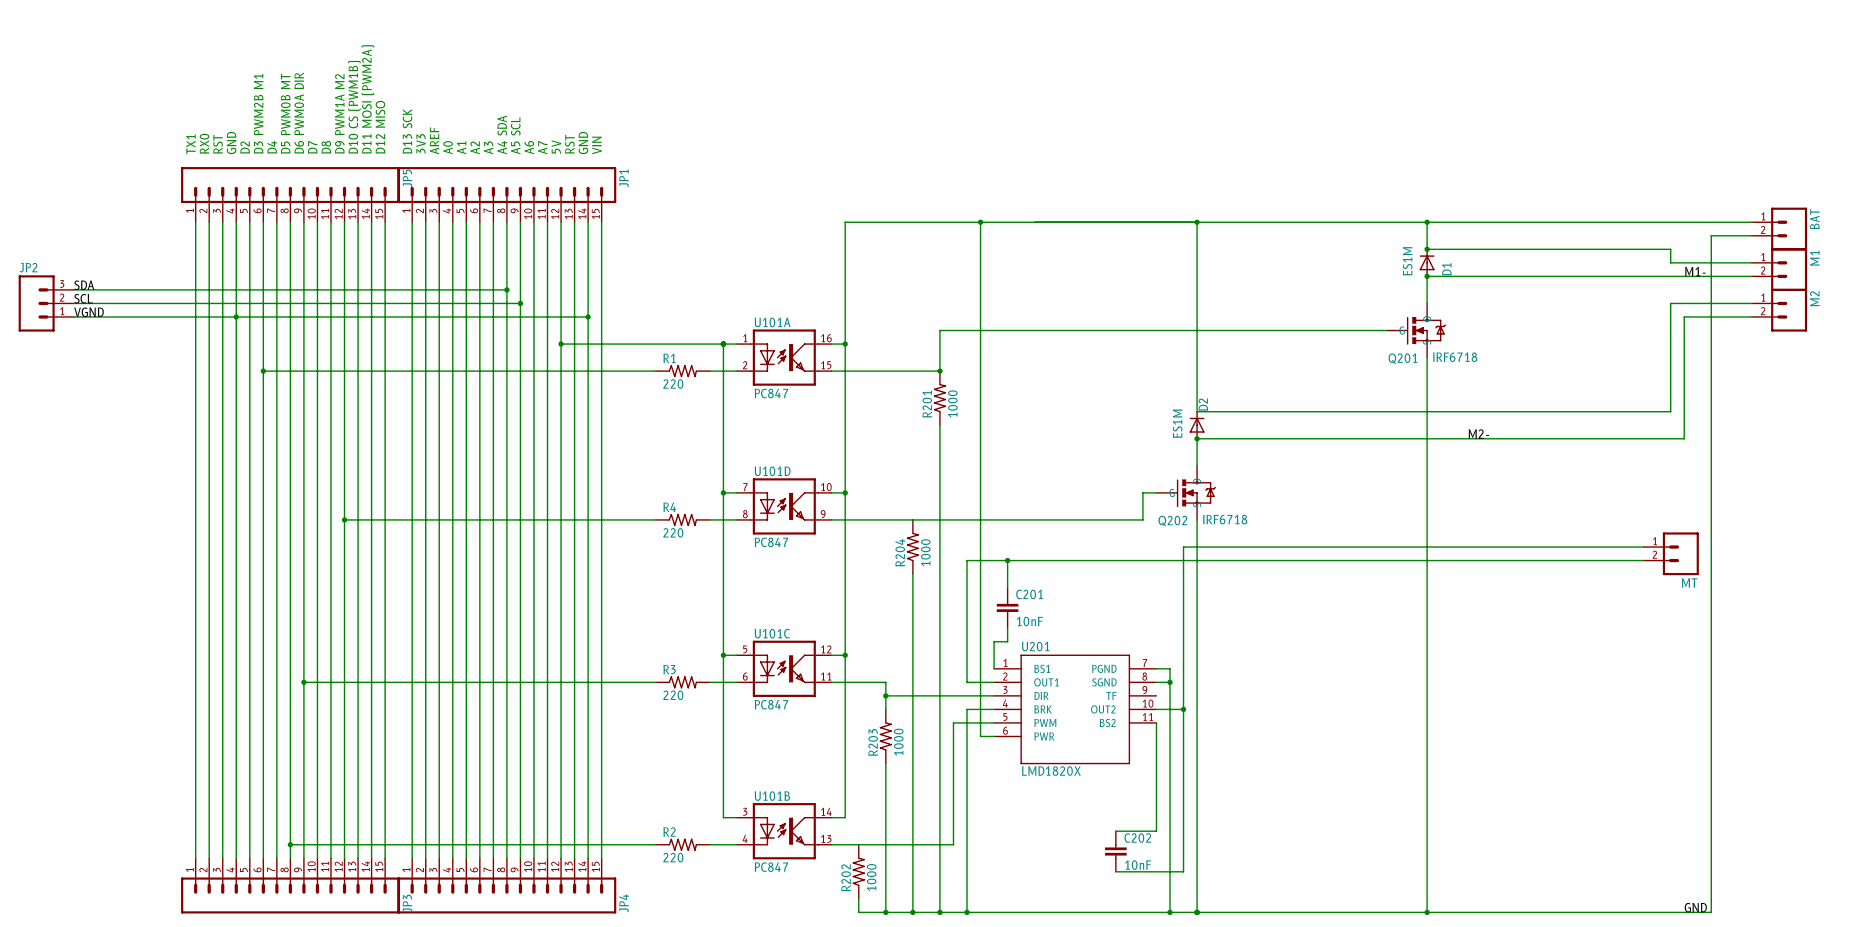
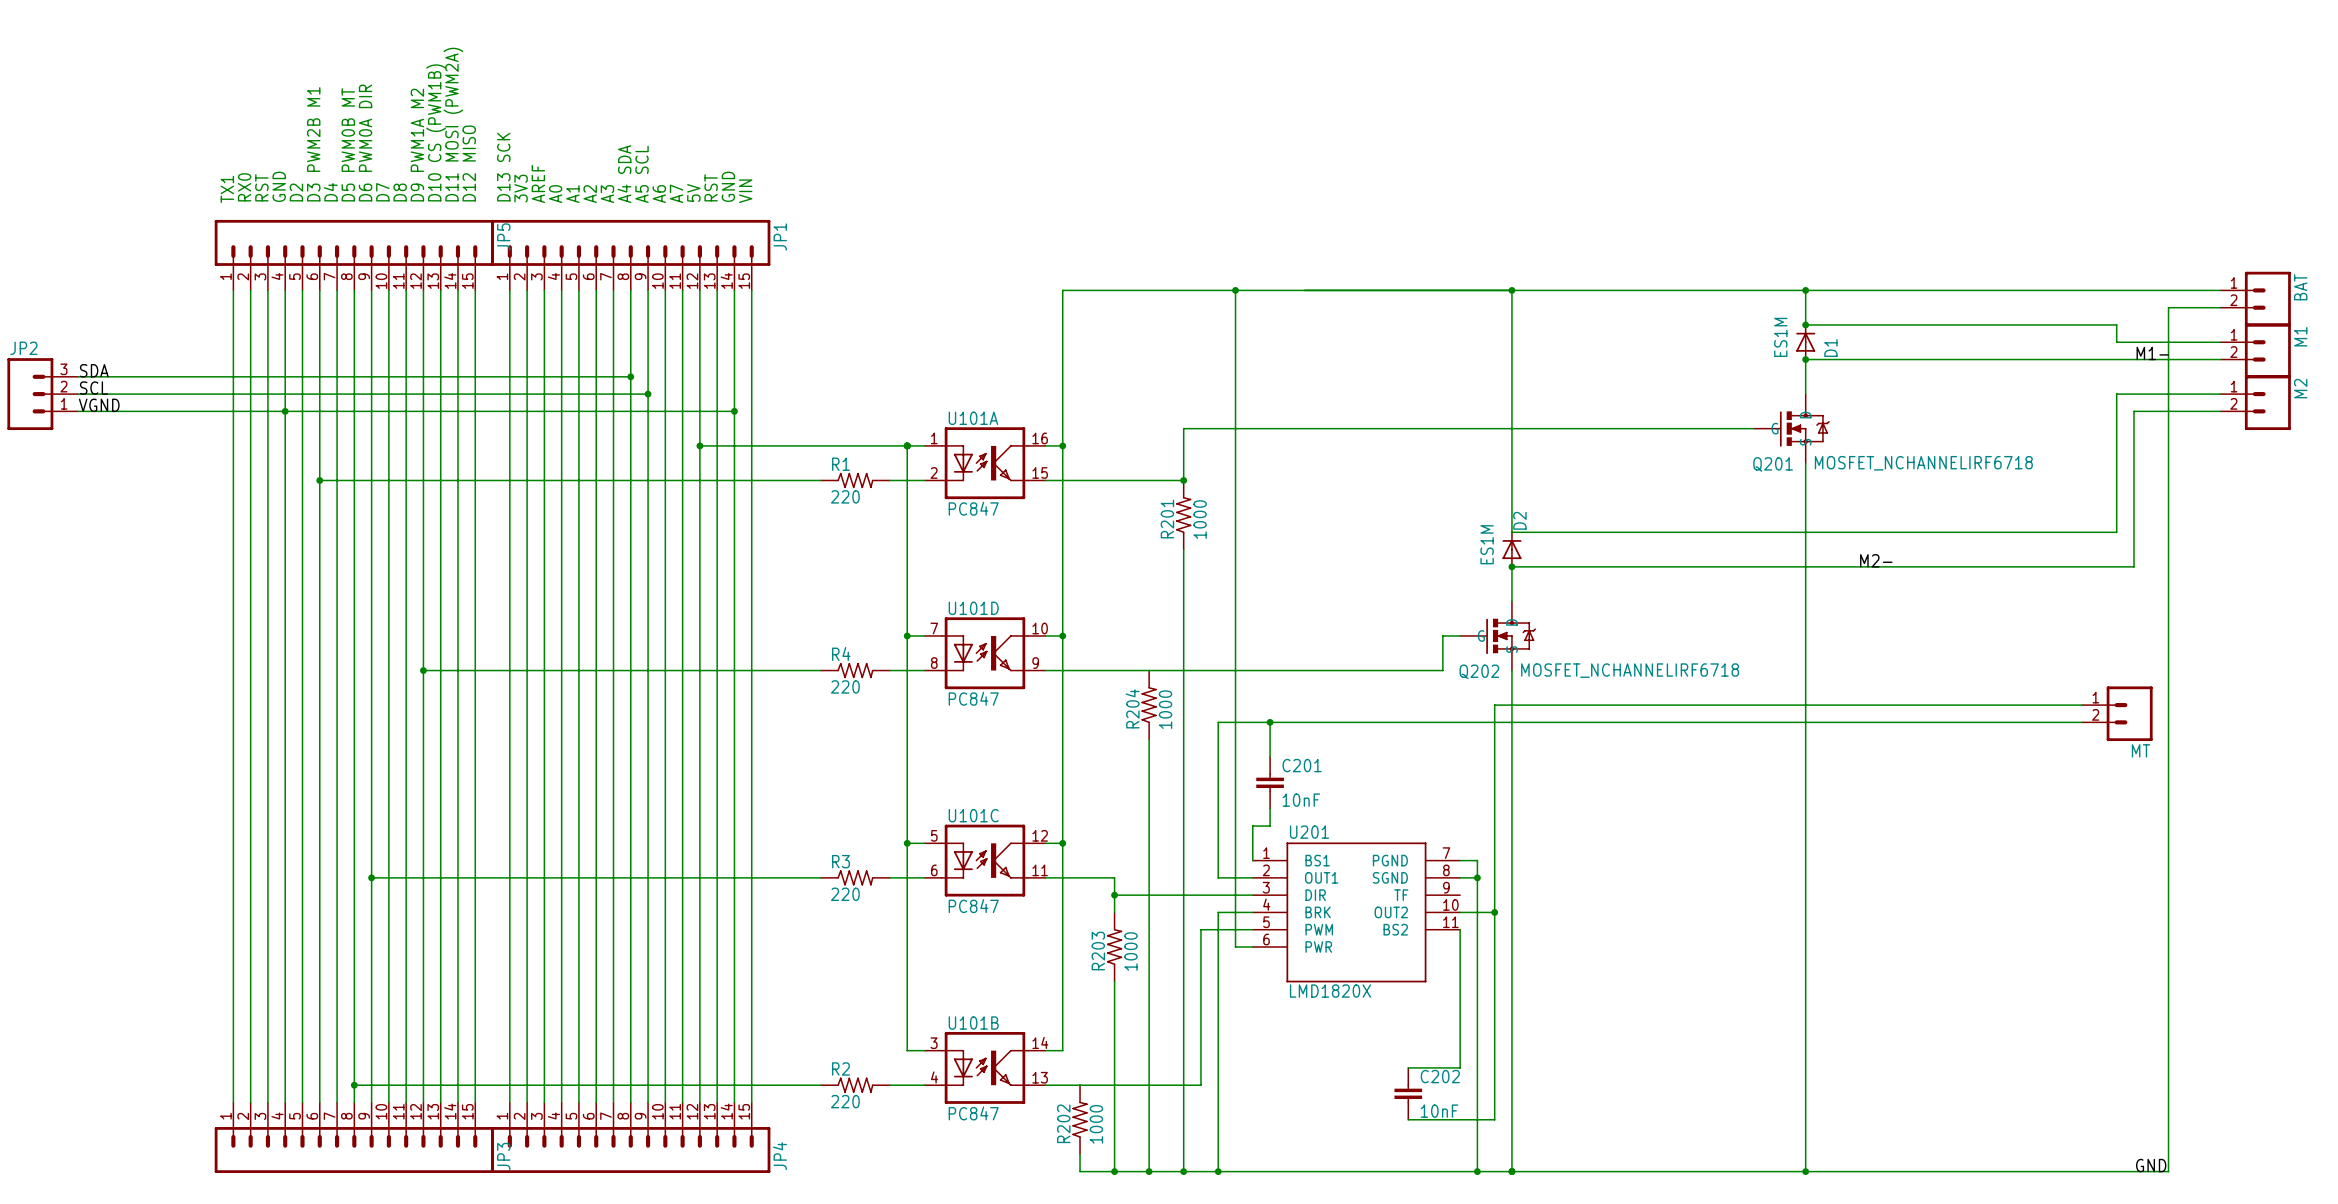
Q201 value: IRF6718 (1455, 357) -> MOSFET_NCHANNELIRF6718 (1923, 463)
Q202 value: IRF6718 (1225, 519) -> MOSFET_NCHANNELIRF6718 (1630, 670)

